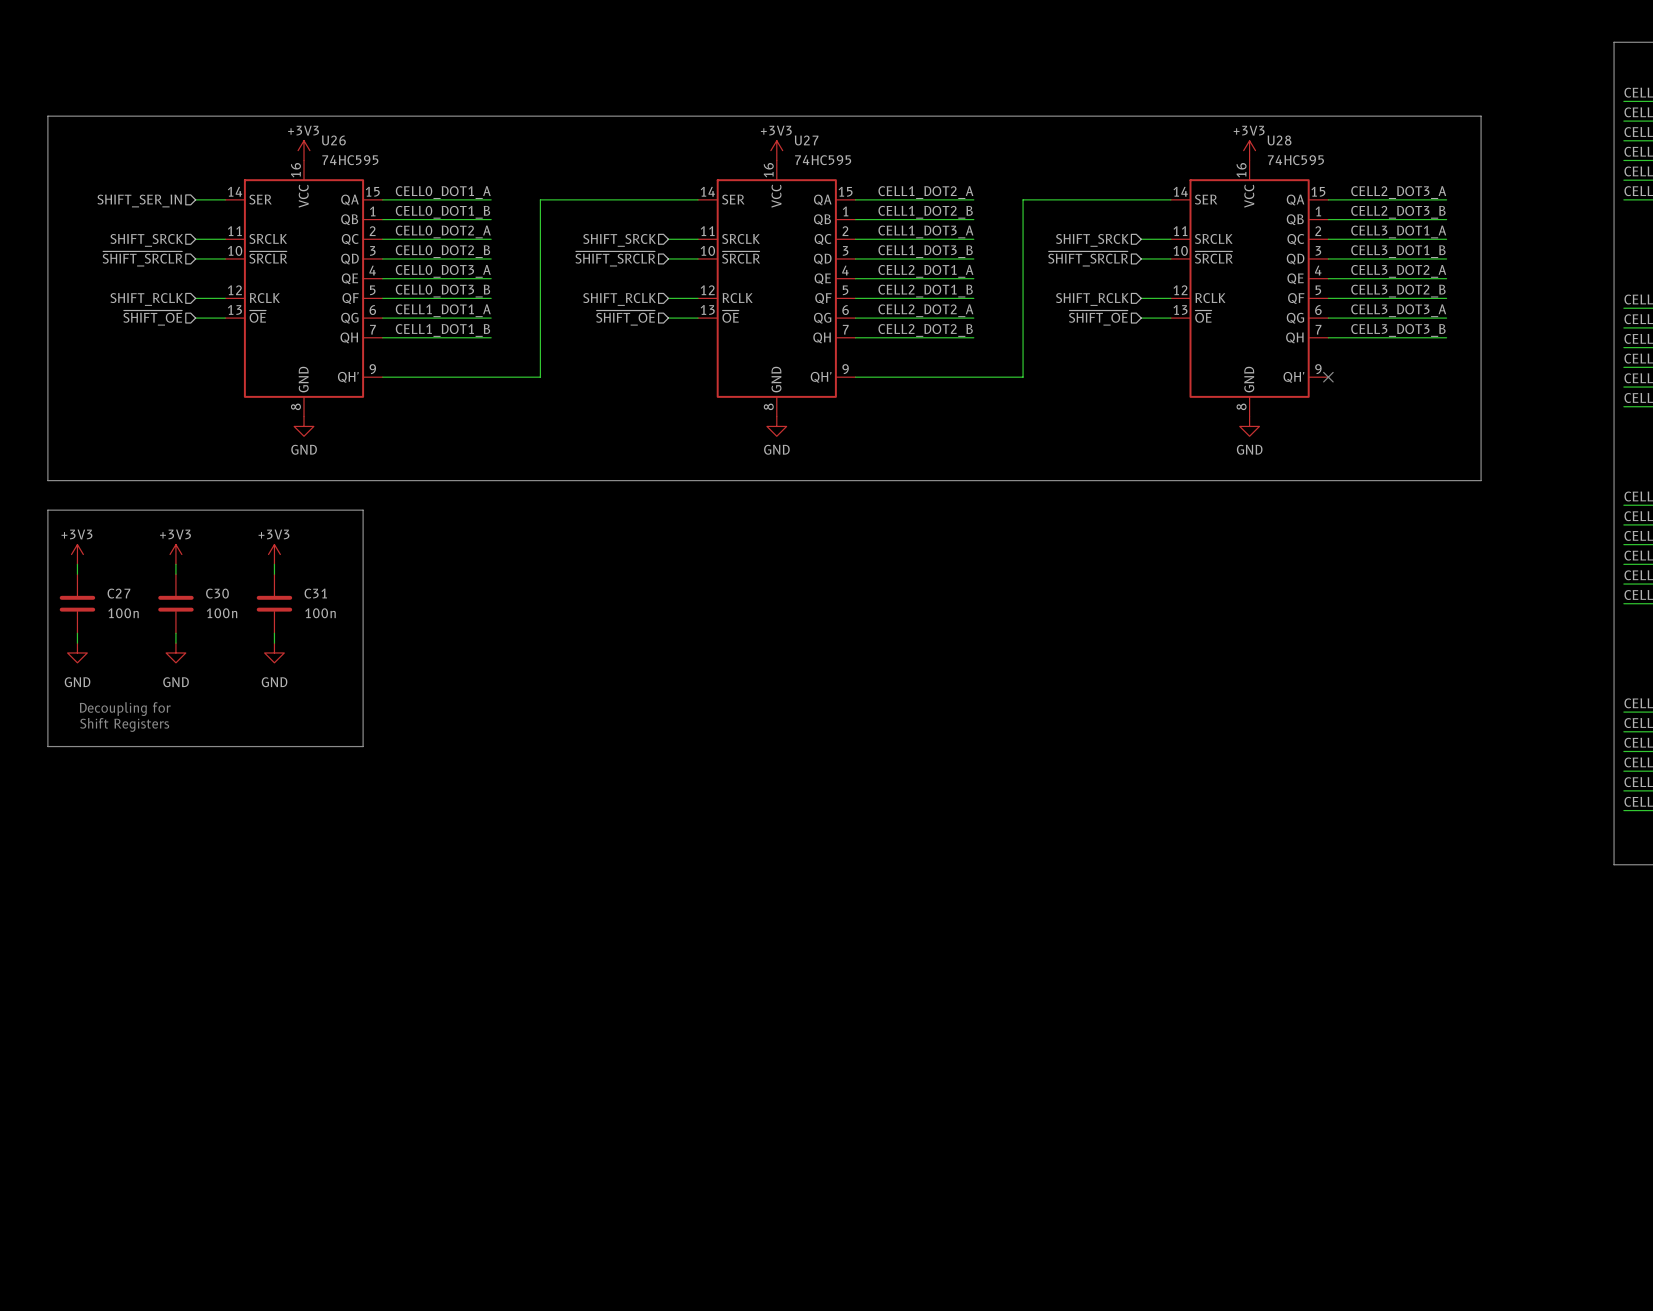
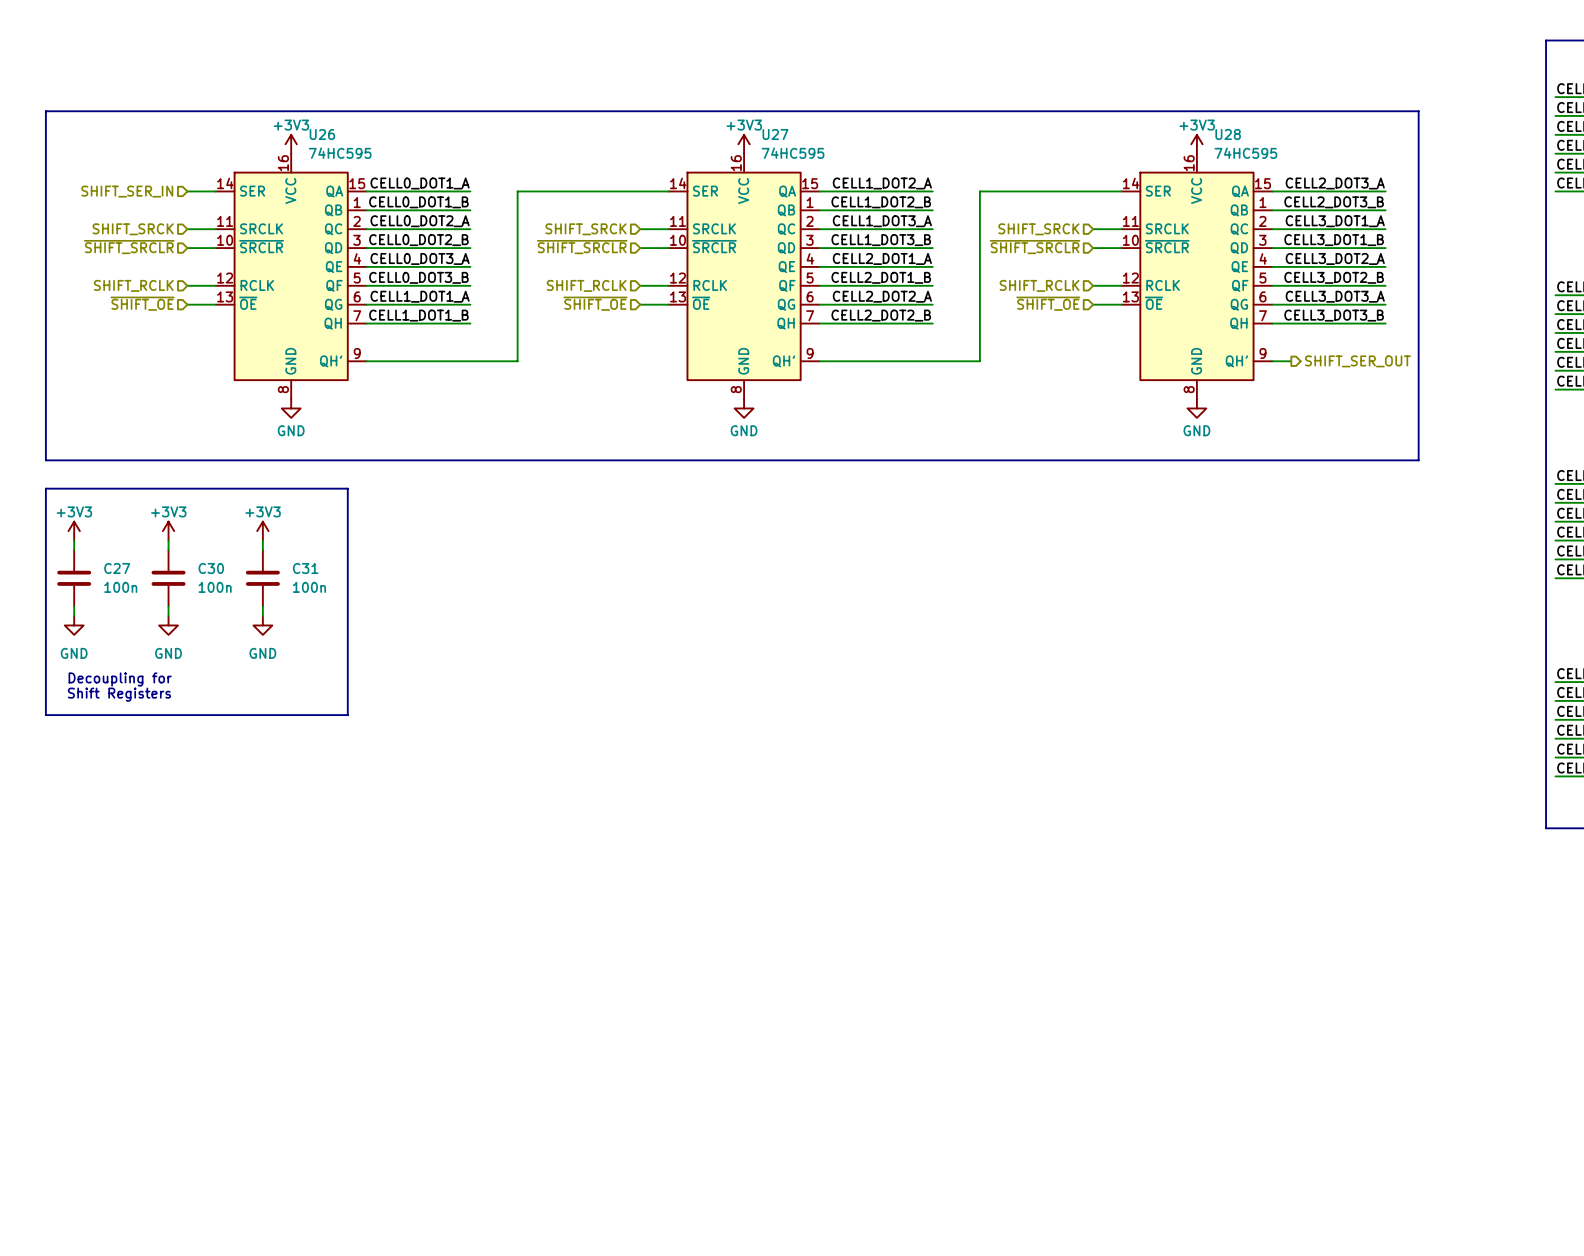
wire: none -> (1272, 361) (1291, 361)
no-connect mark: (1328, 377) -> none
hierarchical label: none -> SHIFT_SER_OUT (1357, 361)

